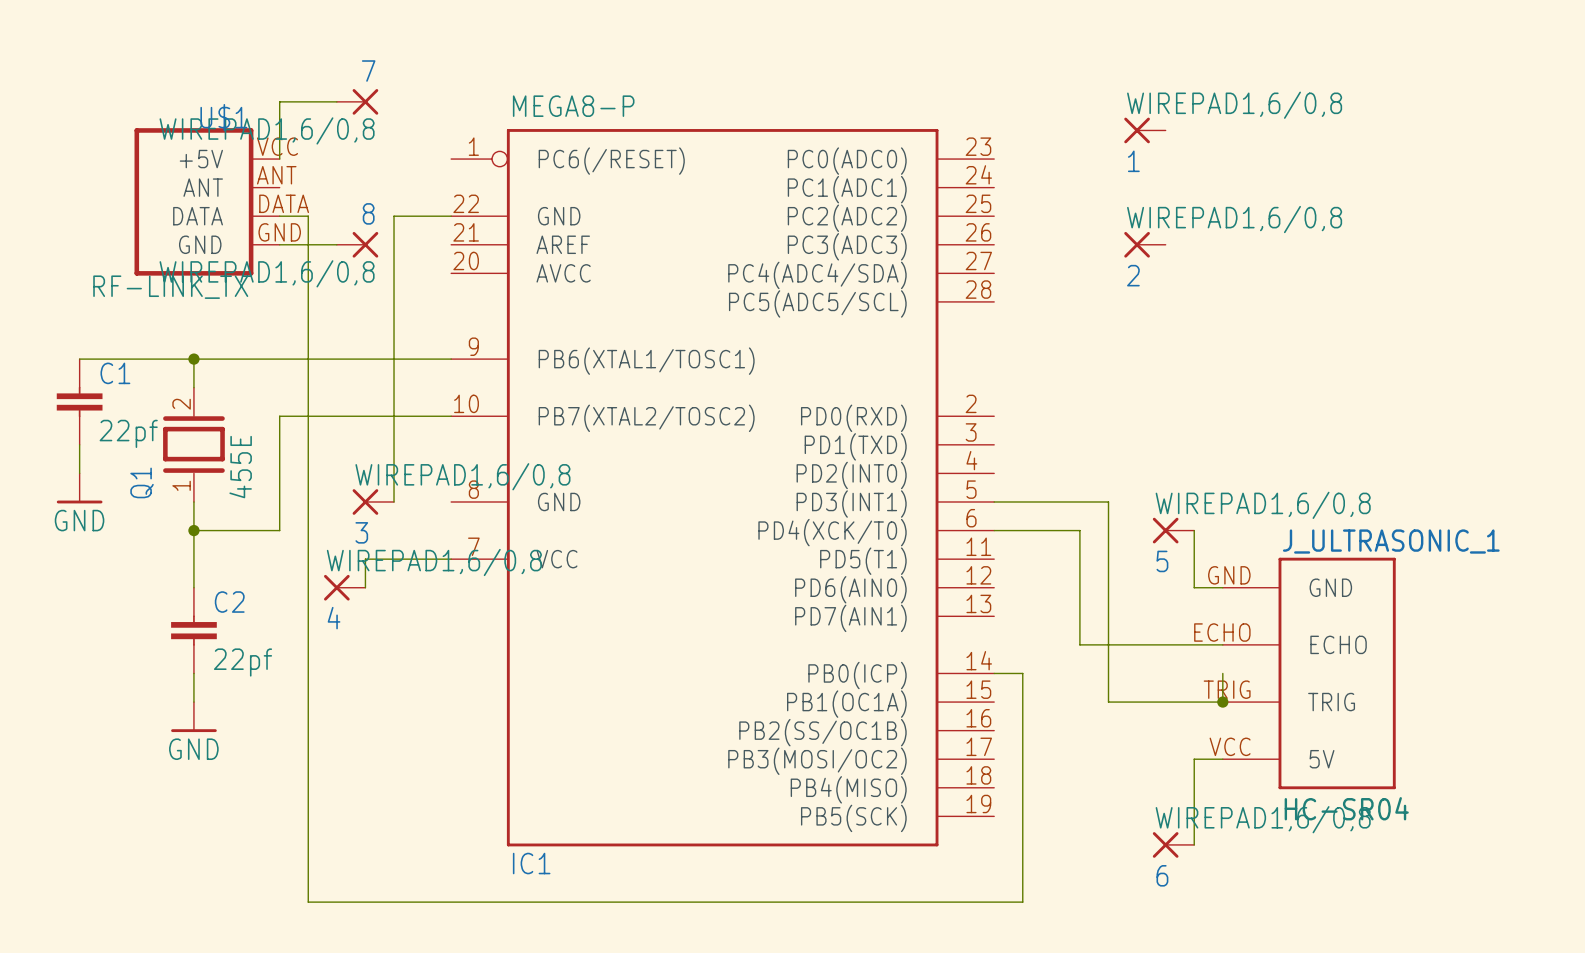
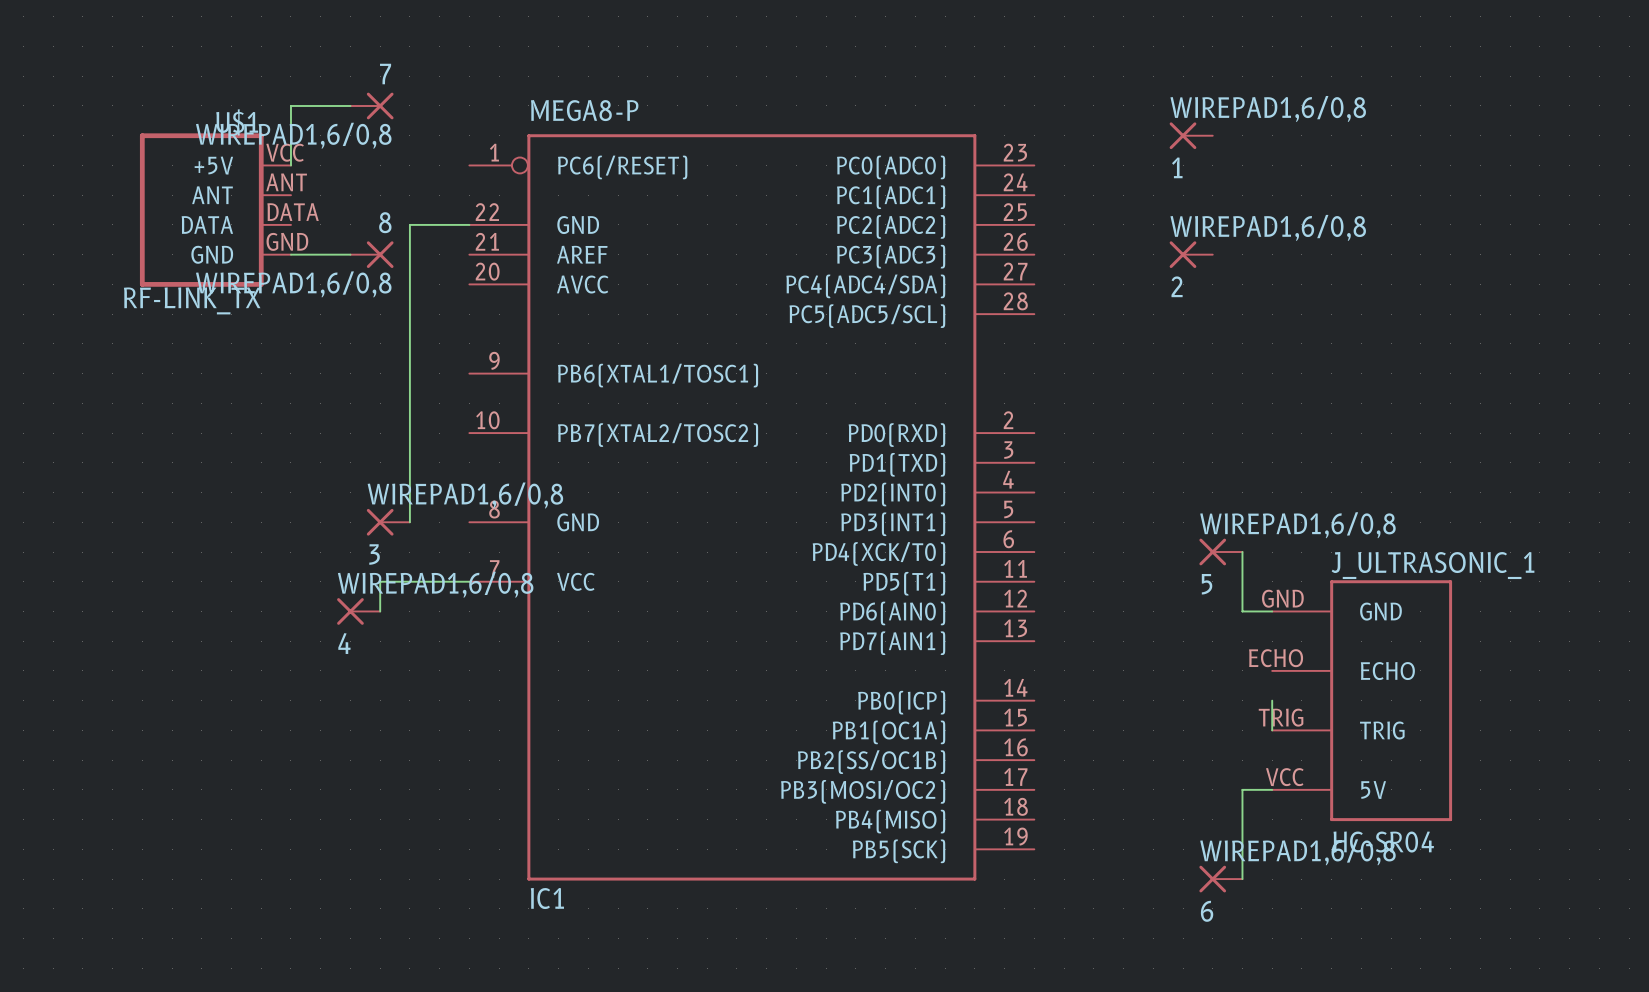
wire: (279, 216) (308, 216) (308, 902) (1022, 902) (1022, 673) (994, 673) -> none
wire: (79, 359) (451, 359) -> none
wire: (193, 359) (193, 387) -> none
junction: (193, 359) -> none
C1: 22pf (79, 401) -> none
wire: (451, 416) (279, 416) (279, 530) (193, 530) -> none
wire: (79, 444) (79, 473) -> none
Q1: 455E (193, 444) -> none
power symbol: GND (79, 488) -> none
wire: (193, 501) (193, 587) -> none
wire: (994, 501) (1108, 501) (1108, 702) (1222, 702) -> none
junction: (193, 530) -> none
wire: (994, 530) (1079, 530) (1079, 644) (1222, 644) -> none
C2: 22pf (193, 630) -> none
wire: (193, 673) (193, 702) -> none
junction: (1222, 702) -> none
power symbol: GND (193, 717) -> none

